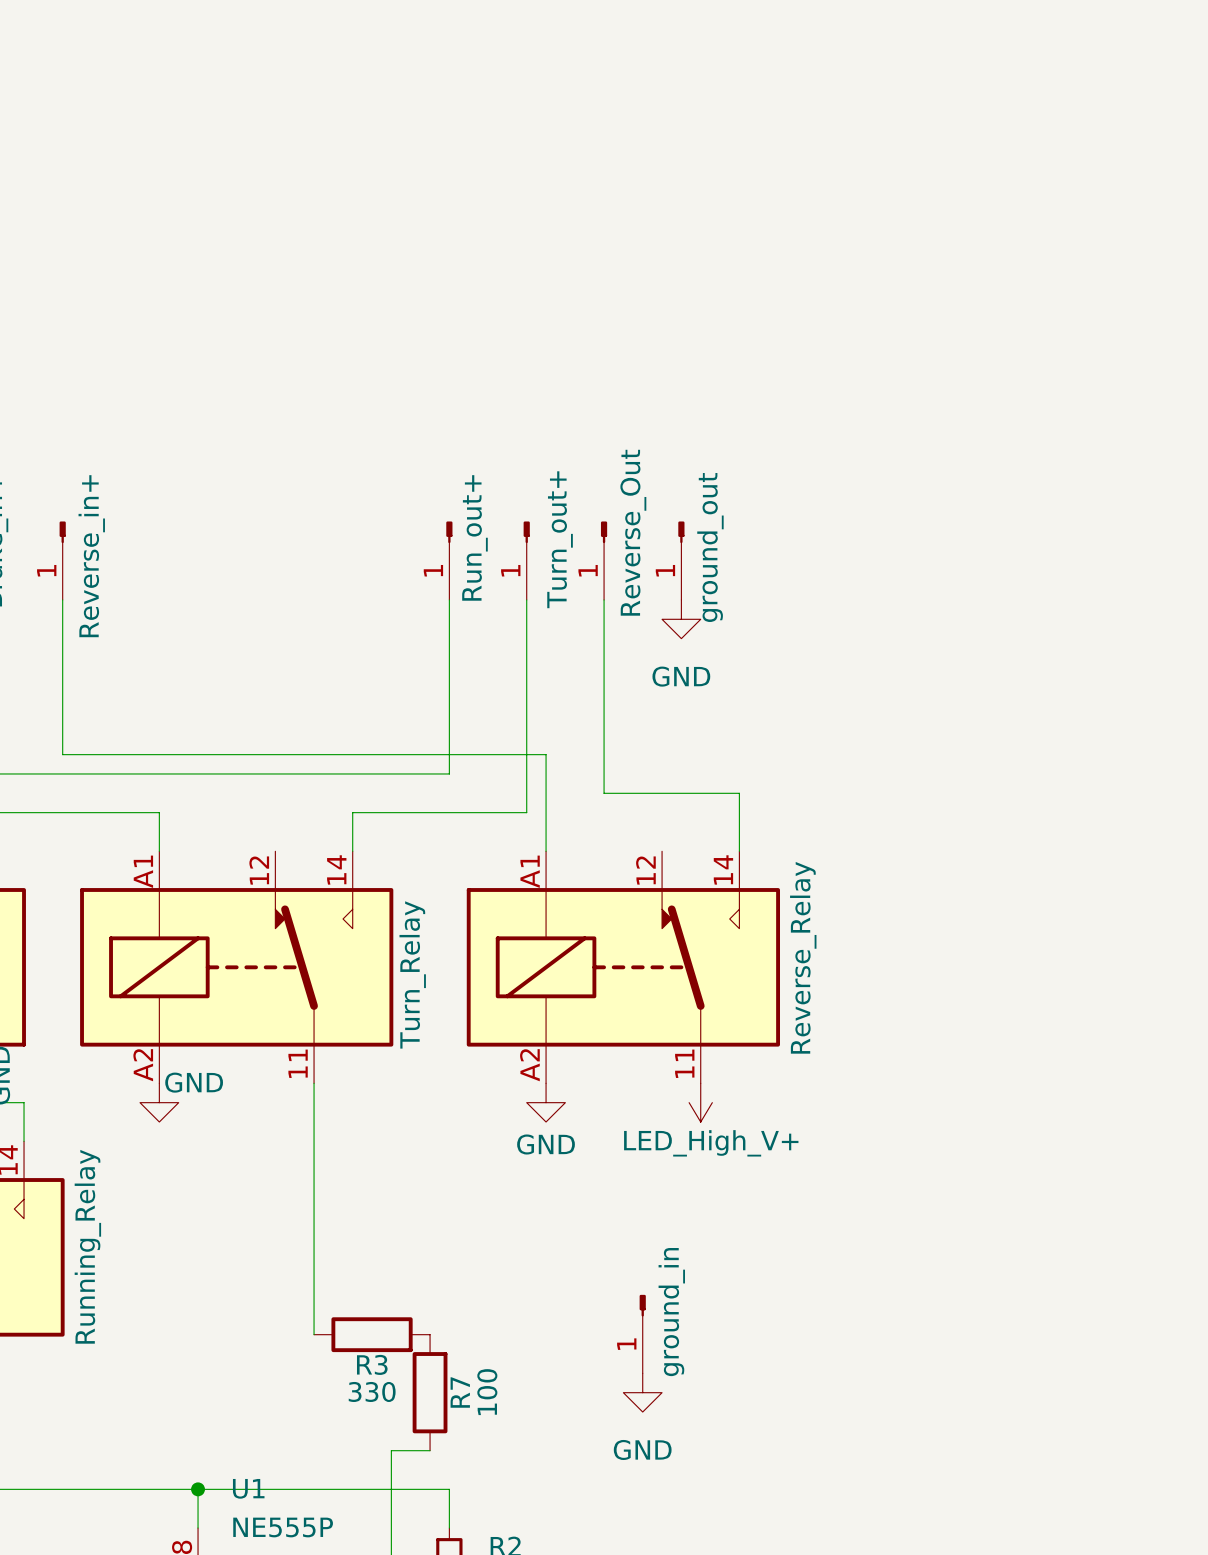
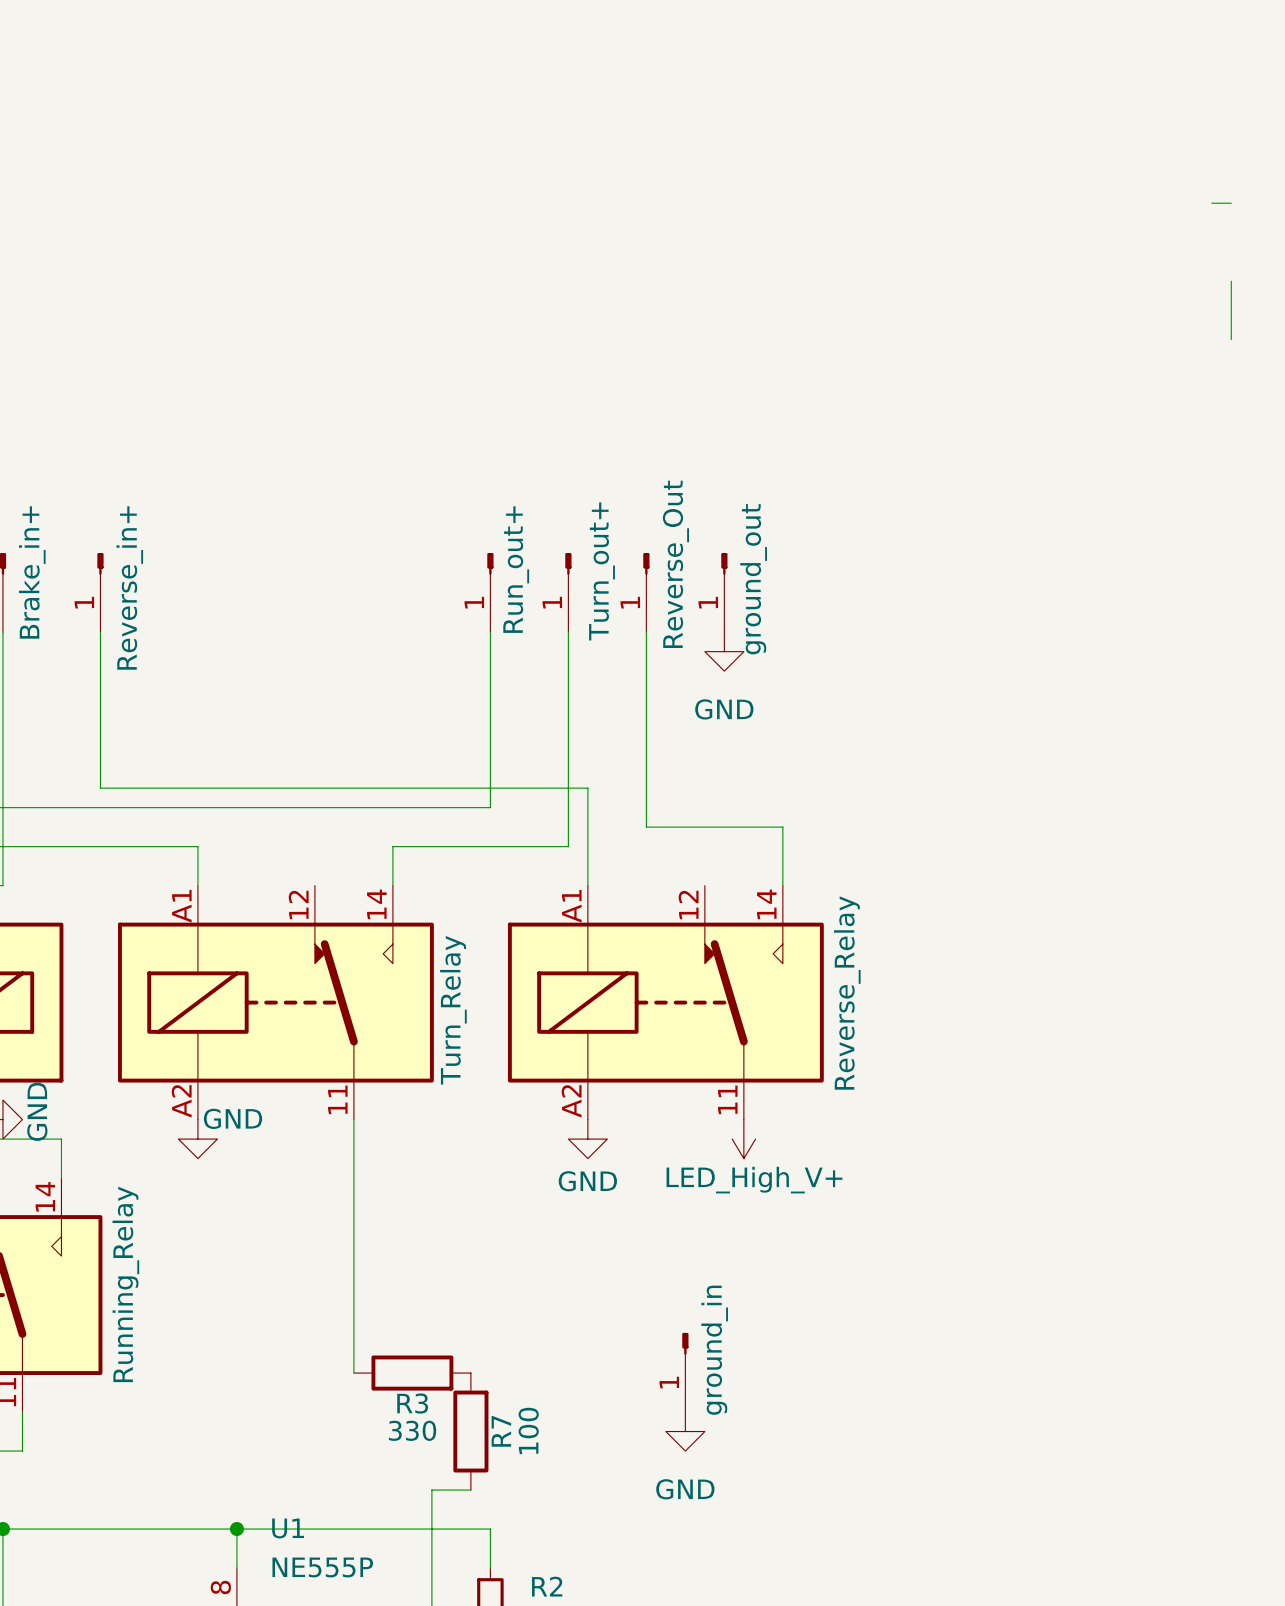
wire: none -> (1211, 203) (1231, 203)
wire: none -> (1231, 281) (1231, 339)

